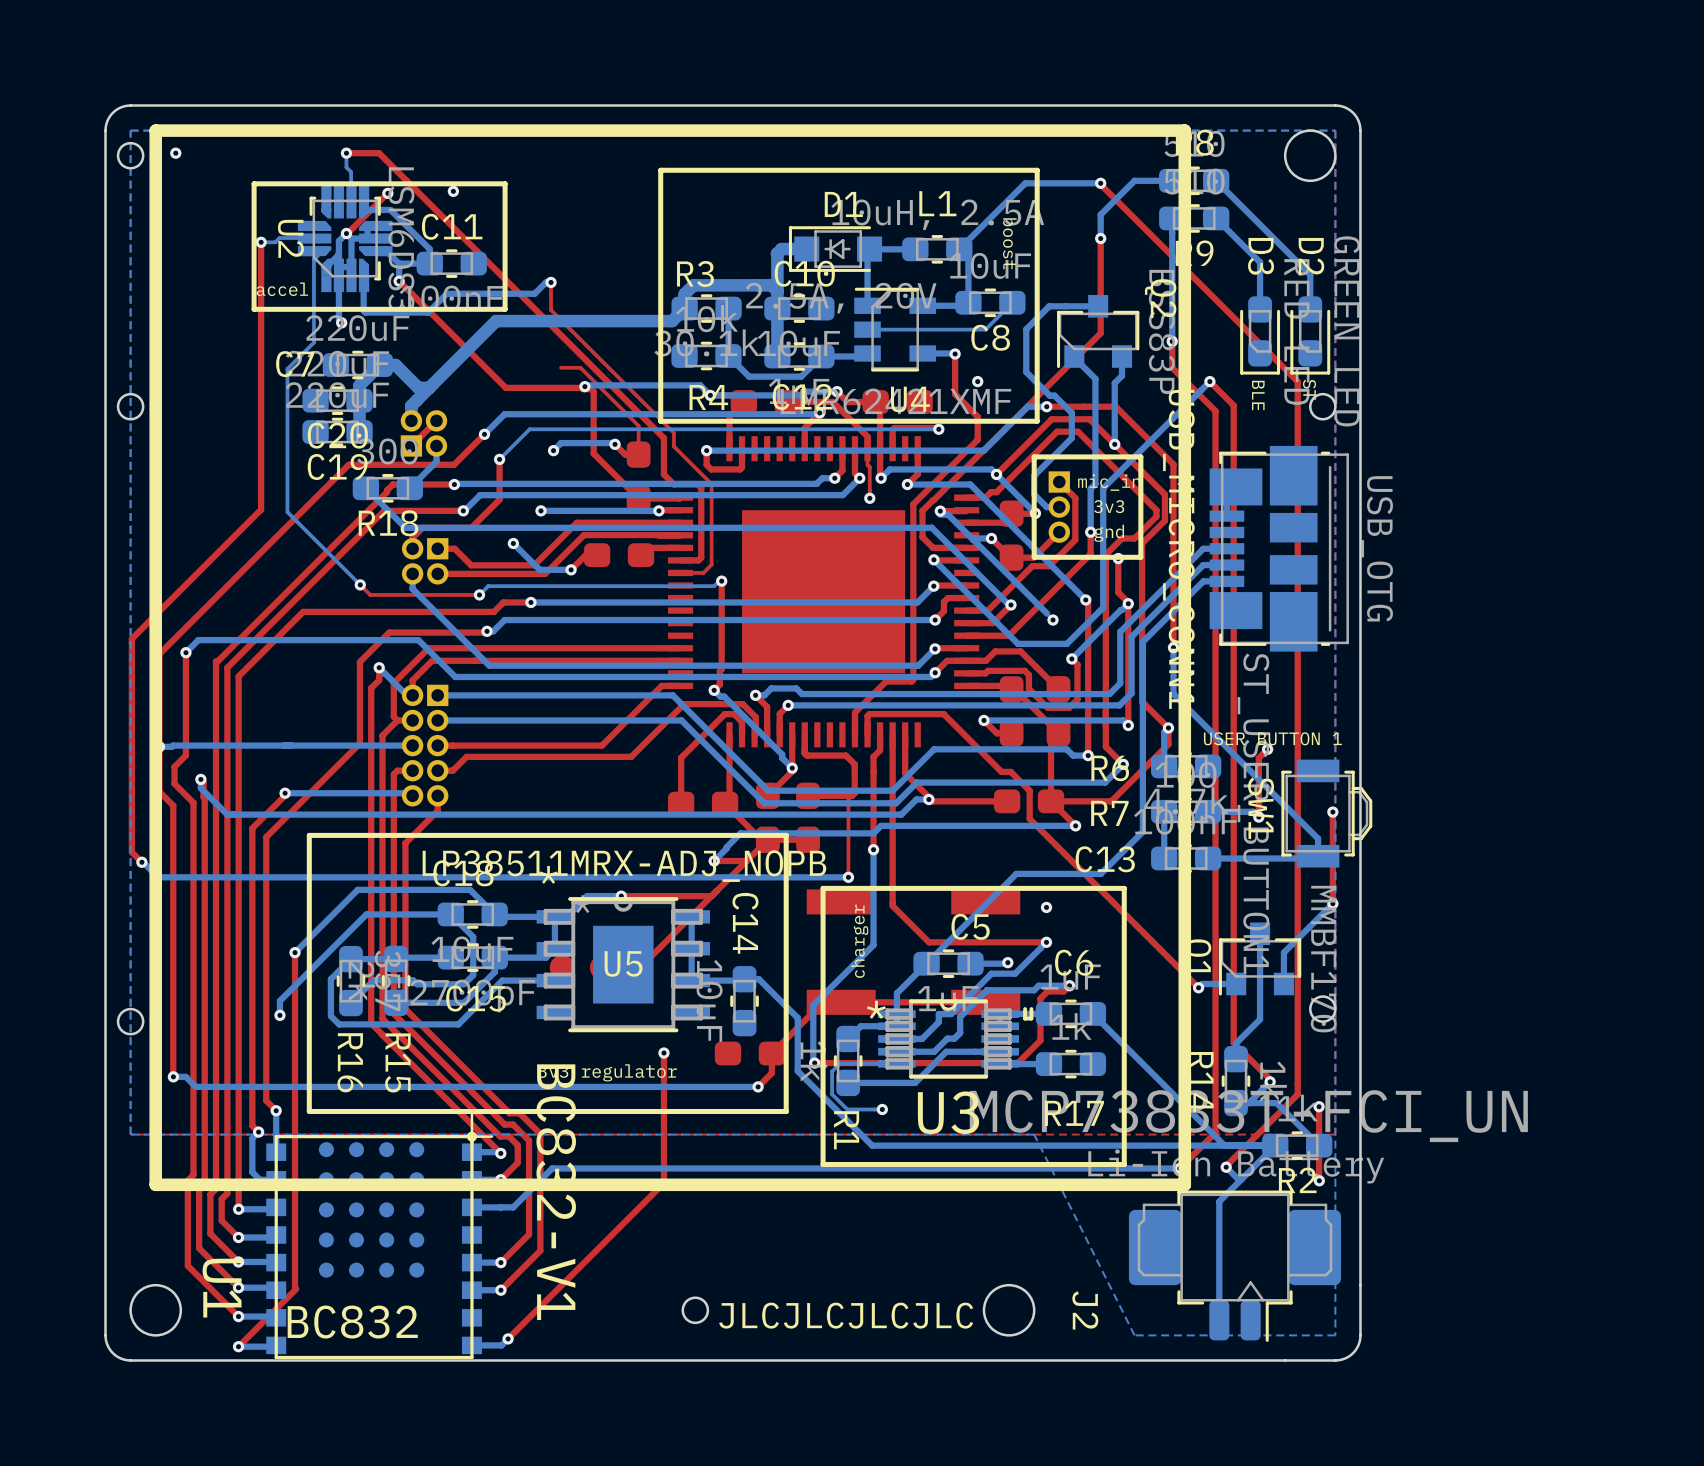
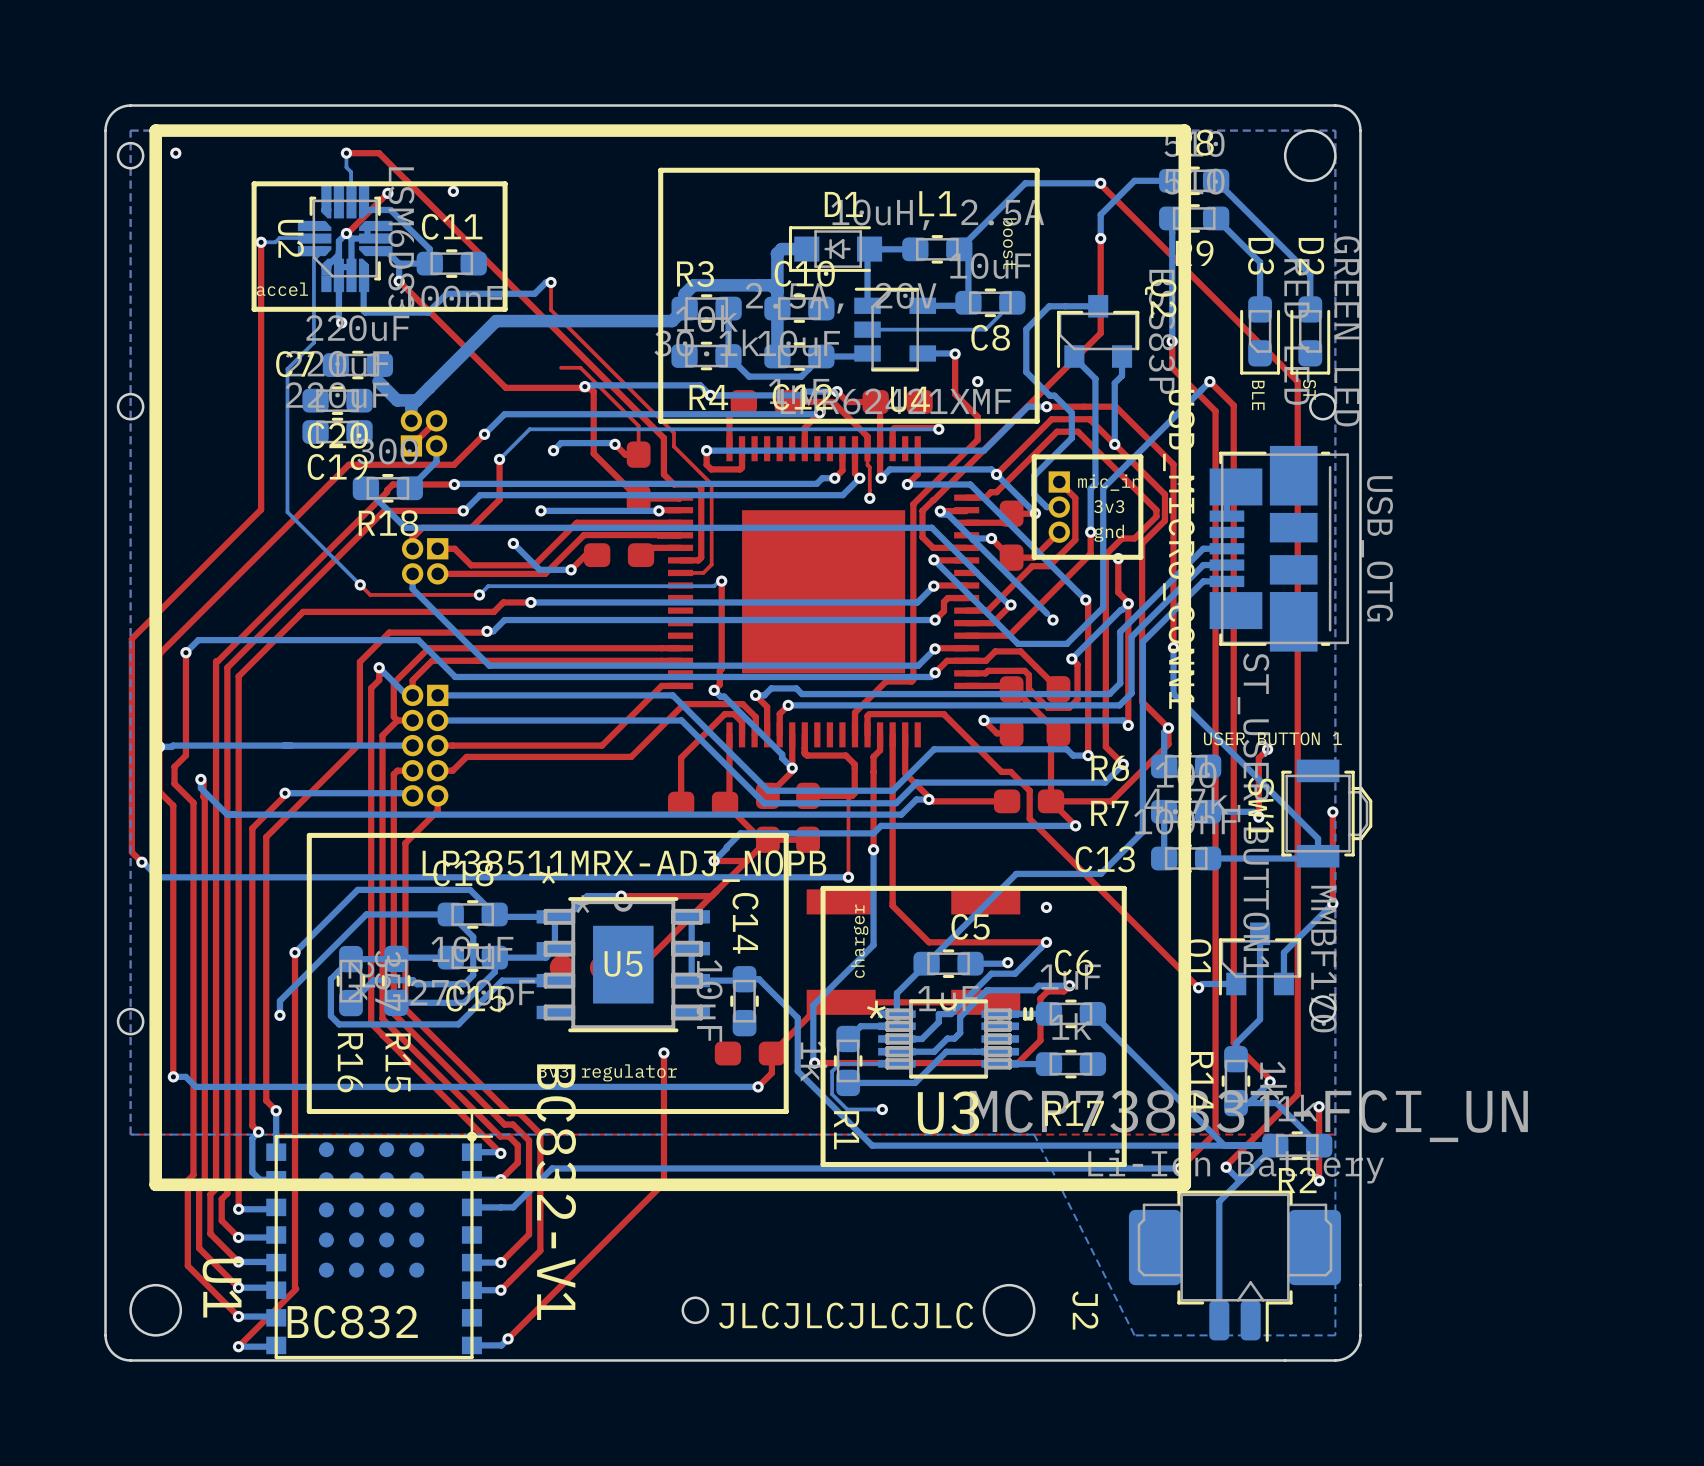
bottom track: none -> (378, 381) (397, 400) (416, 400)
bottom track: (429, 387) (418, 387) (395, 365) (379, 365) (359, 385) (359, 432) -> none

